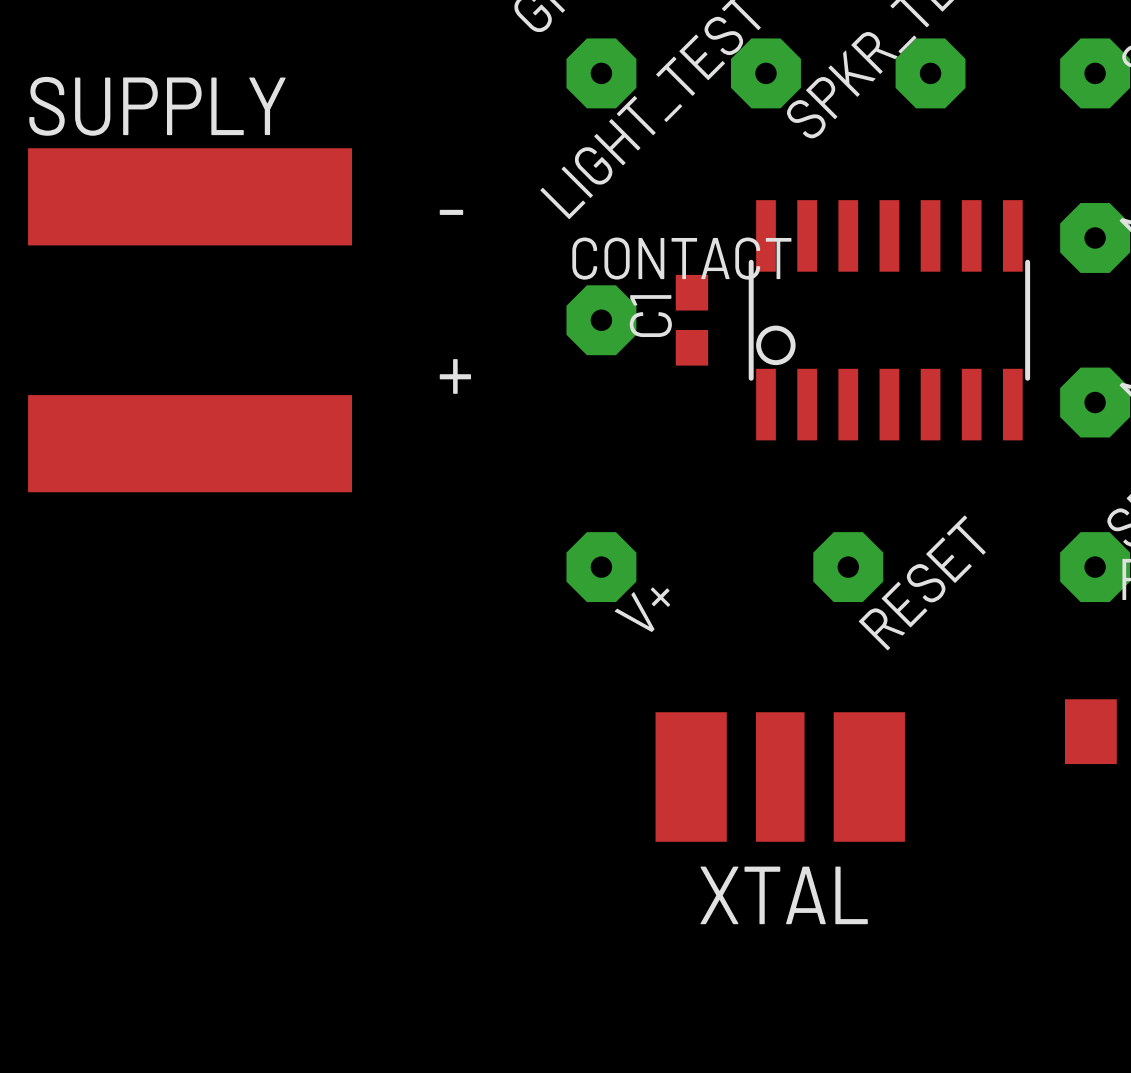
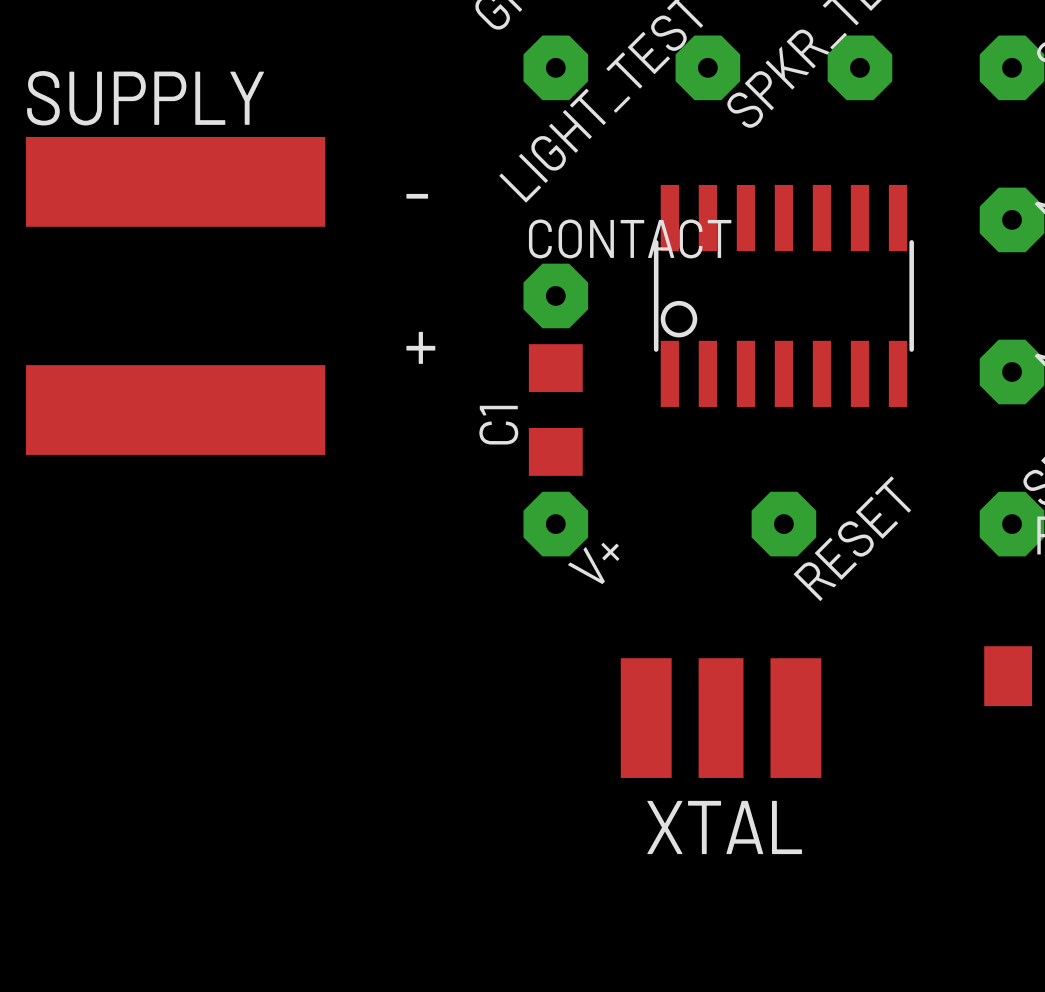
C1 footprint: [675, 274, 709, 366] -> [528, 344, 583, 476]
part position: (889, 320) -> (783, 295)
part footprint: [655, 712, 905, 842] -> [620, 658, 822, 778]

